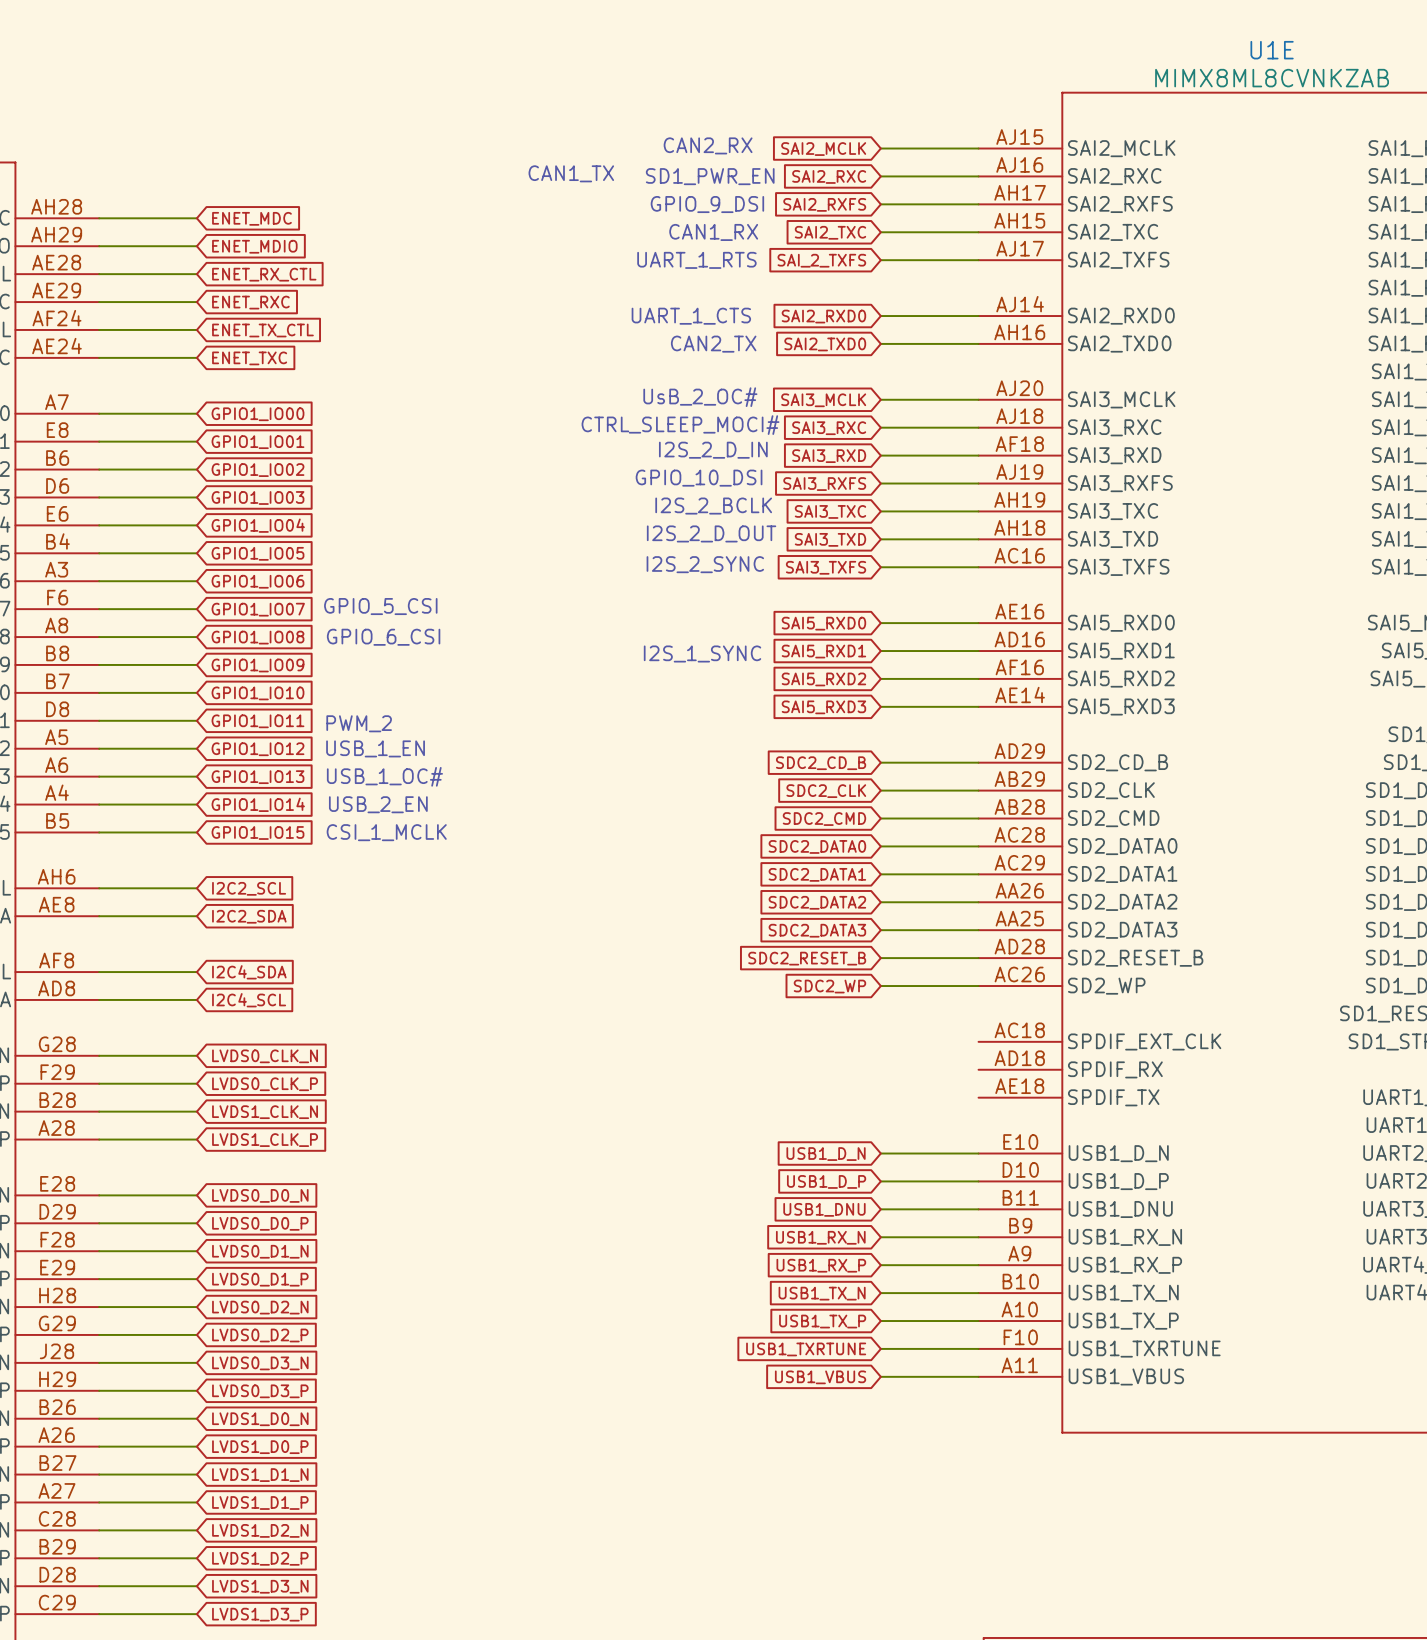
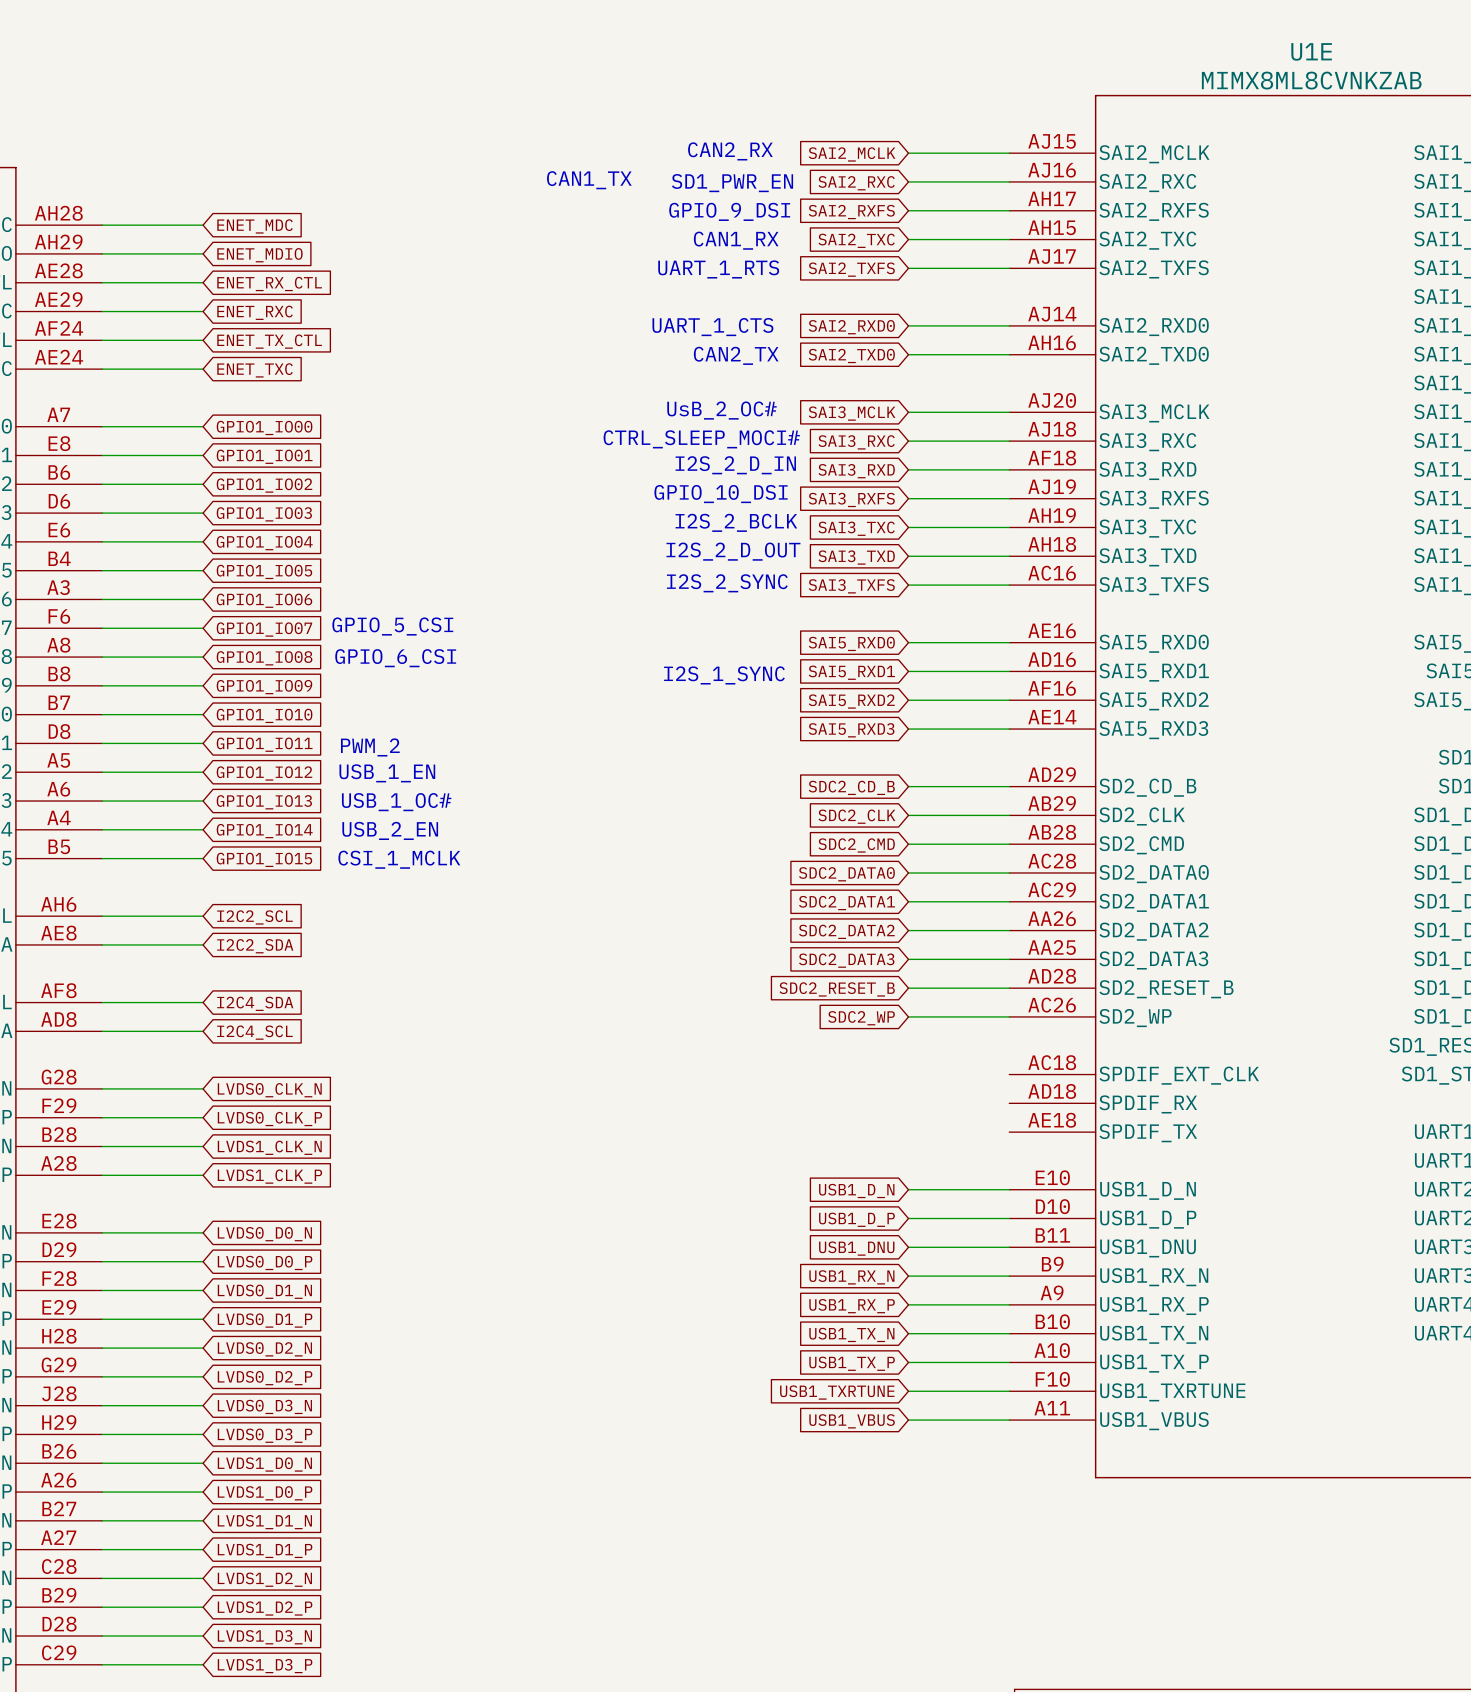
global label: SAI_2_TXFS (821, 260) -> SAI2_TXFS (851, 269)

